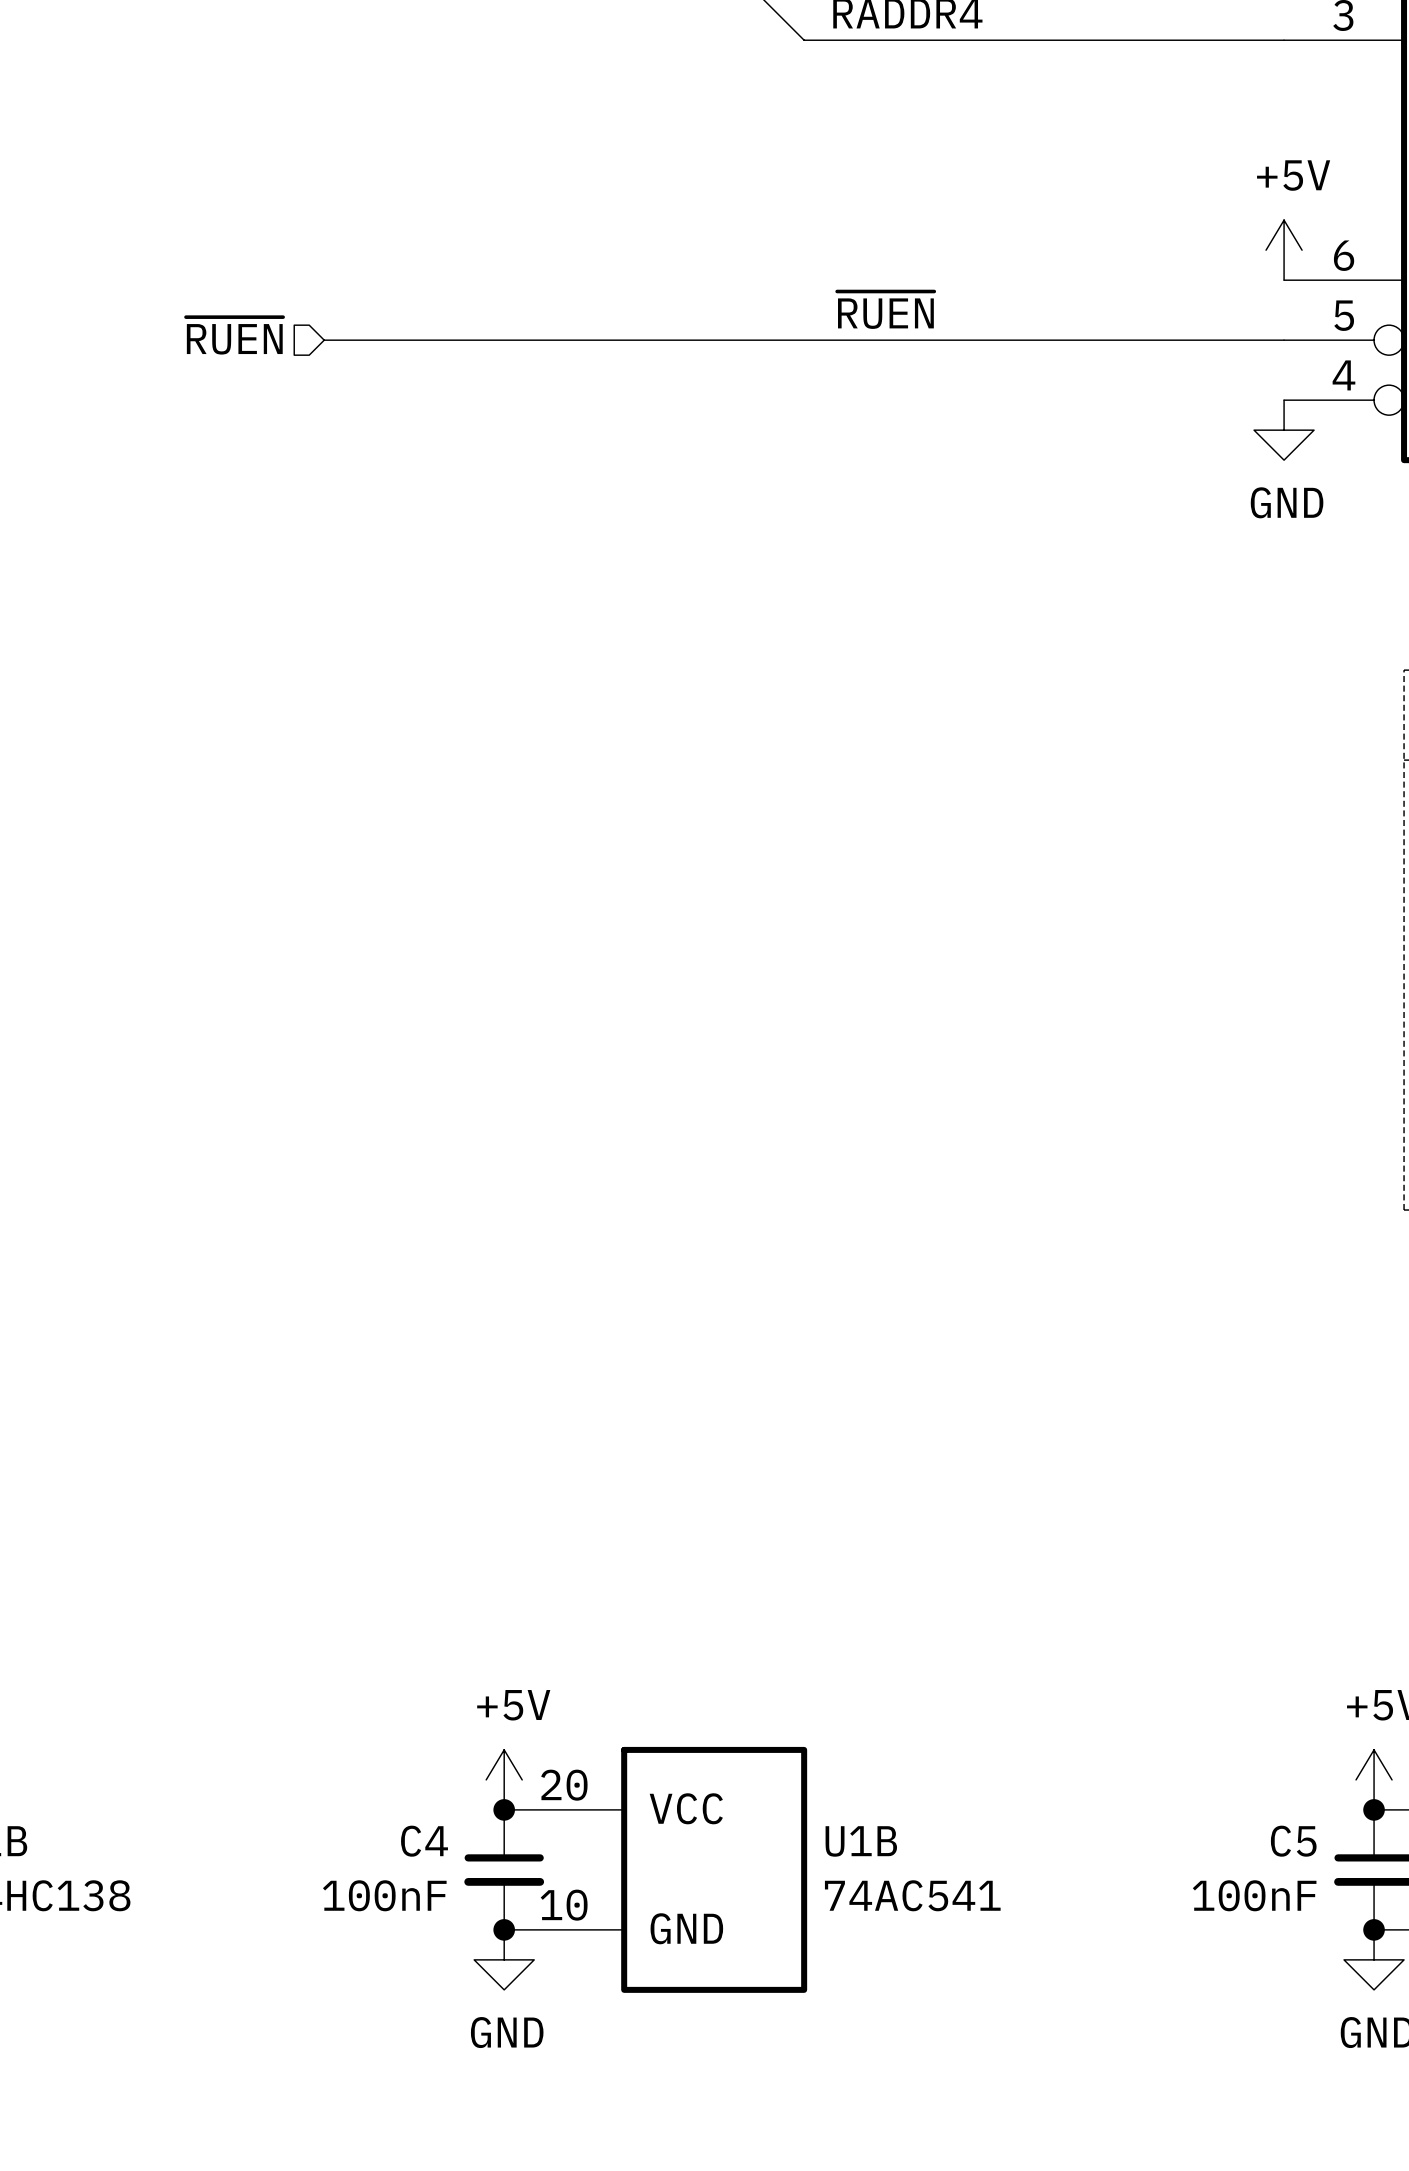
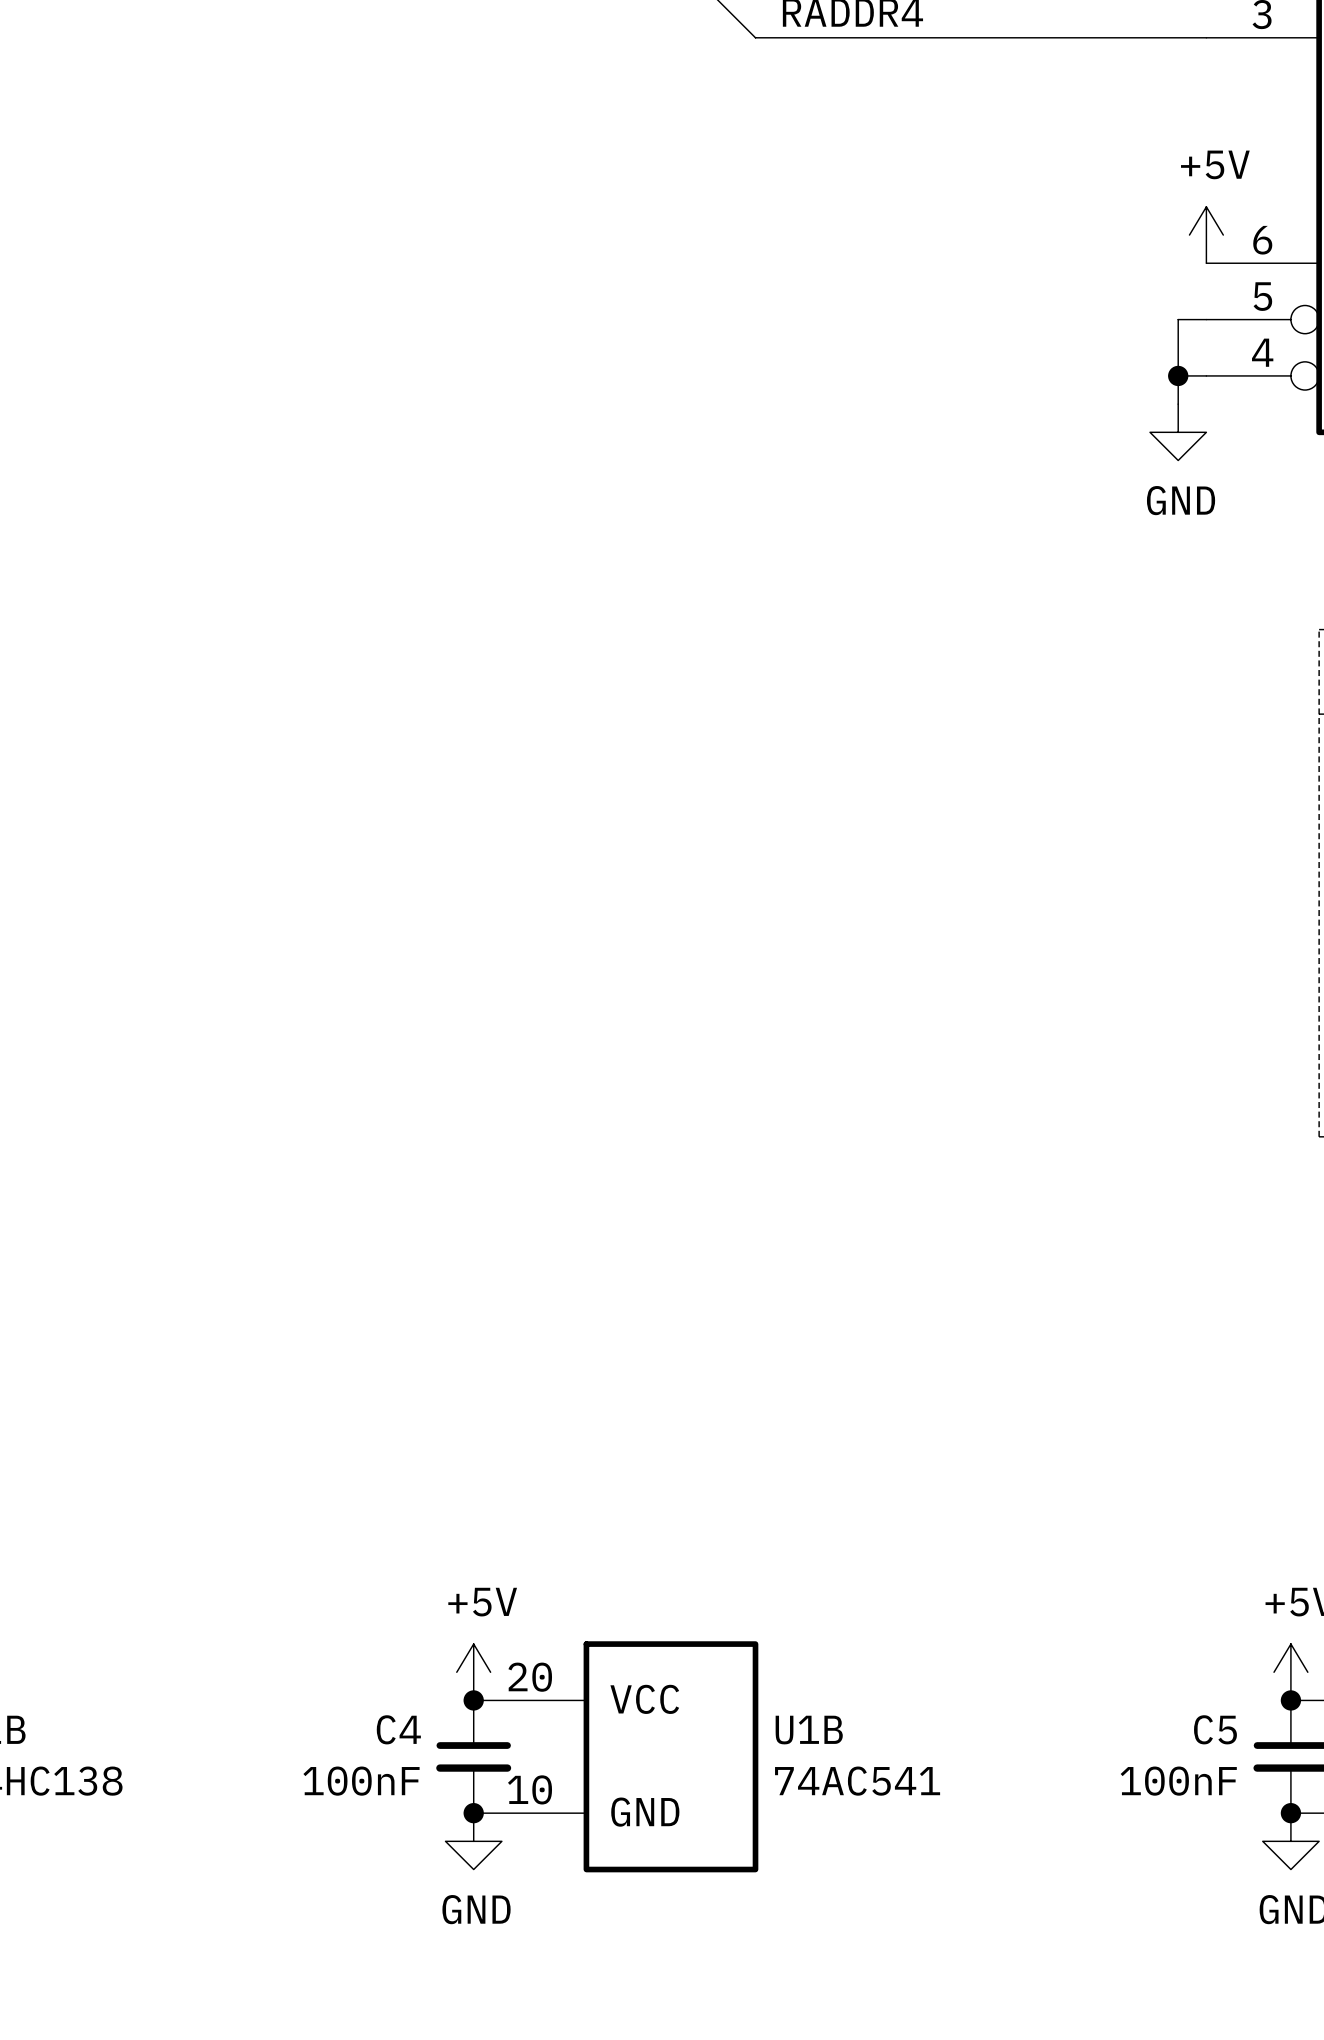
label: ~{RUEN} (885, 310) -> none
hierarchical label: ~{RUEN} (234, 335) -> none
wire: (324, 340) (1254, 340) -> (1178, 404) (1178, 319)
wire: none -> (1178, 375) (1206, 375)
junction: none -> (1178, 375)
power symbol position: GND (1284, 430) -> GND (1178, 432)

